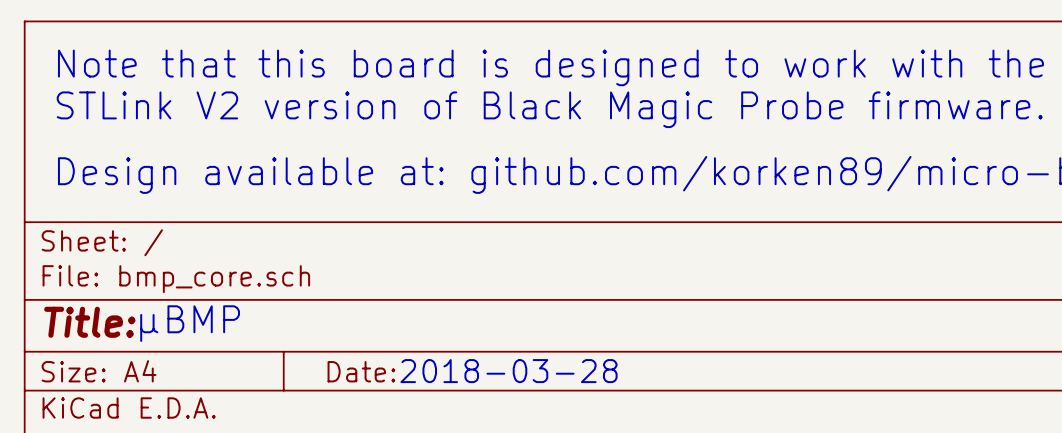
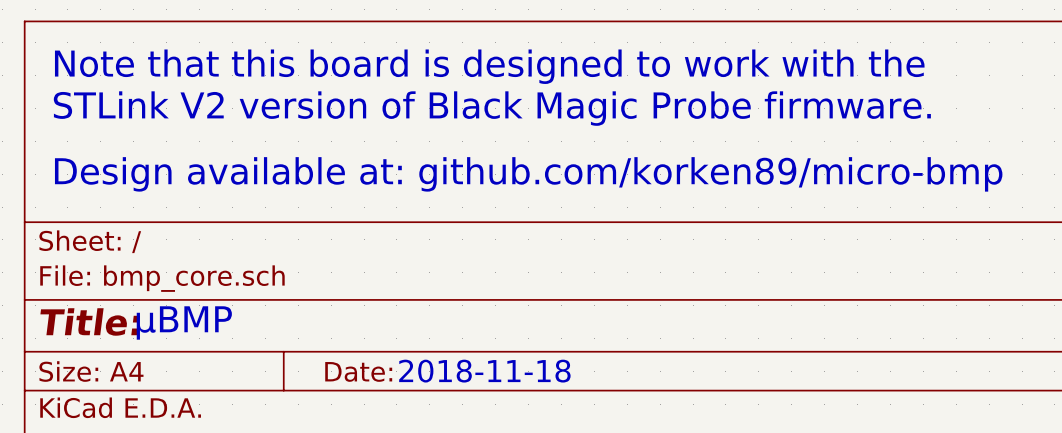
text: 2018-03-28 (508, 371) -> 2018-11-18 (484, 371)

